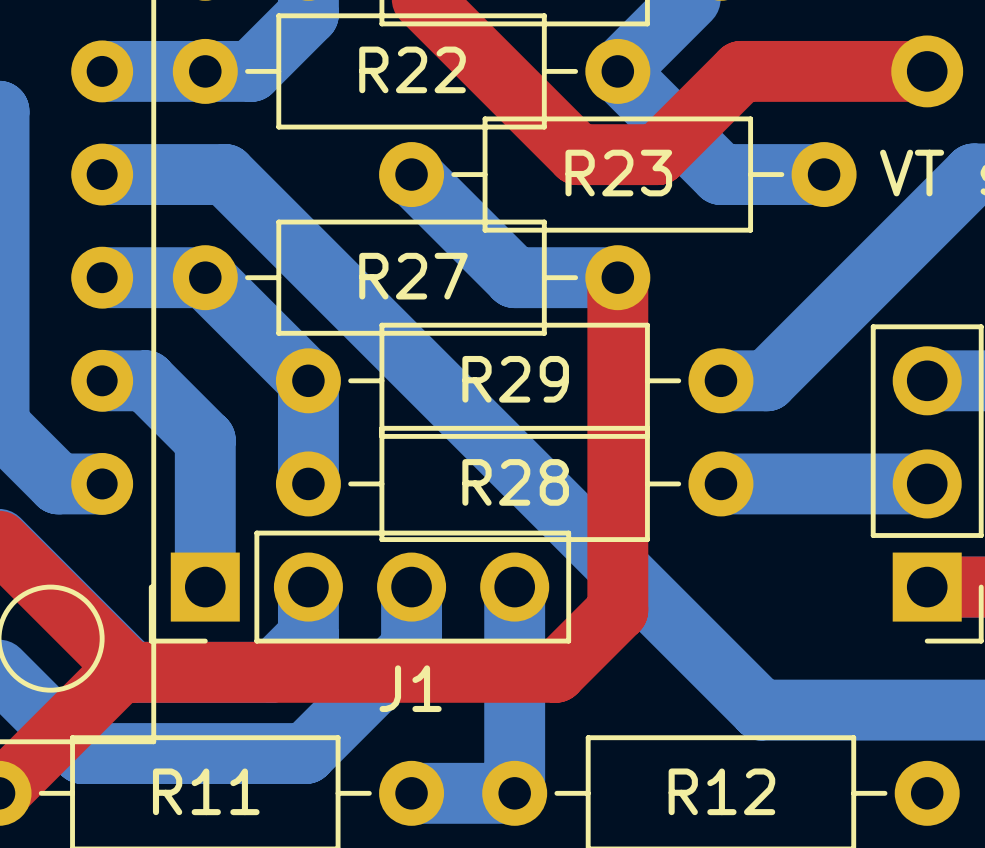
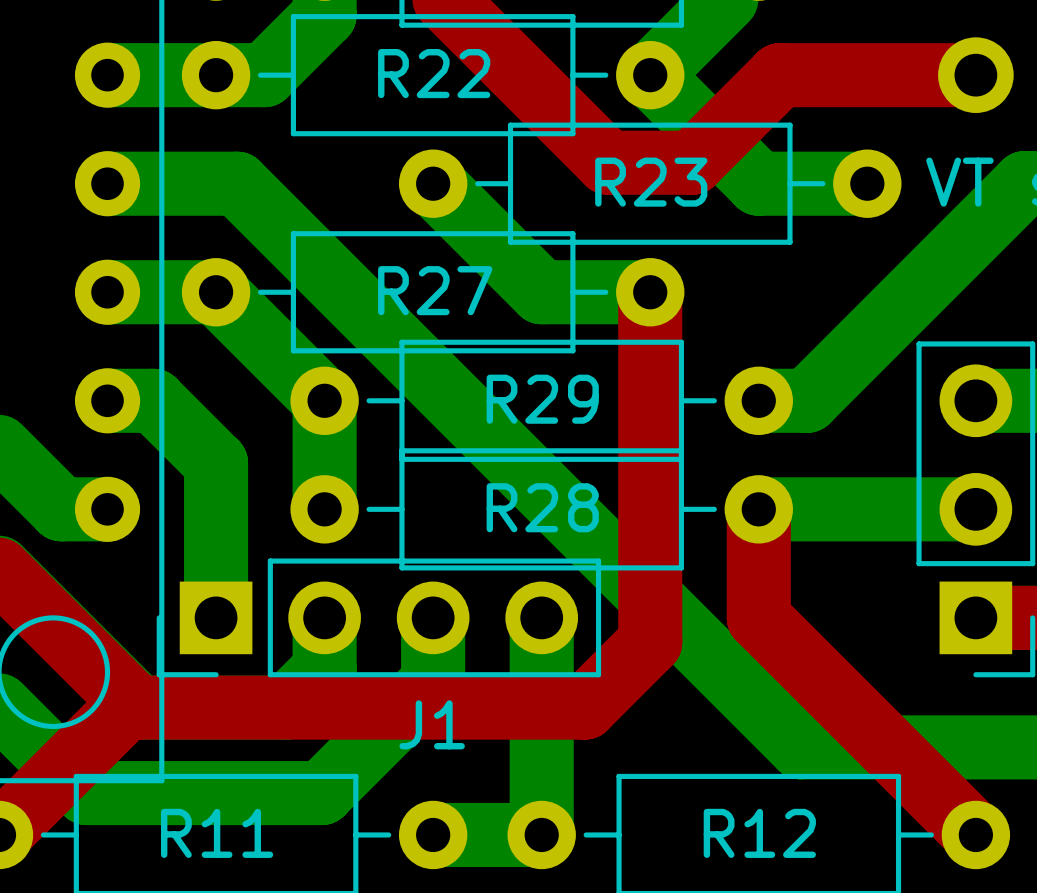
top track: none -> (758, 509) (758, 617) (975, 834)

